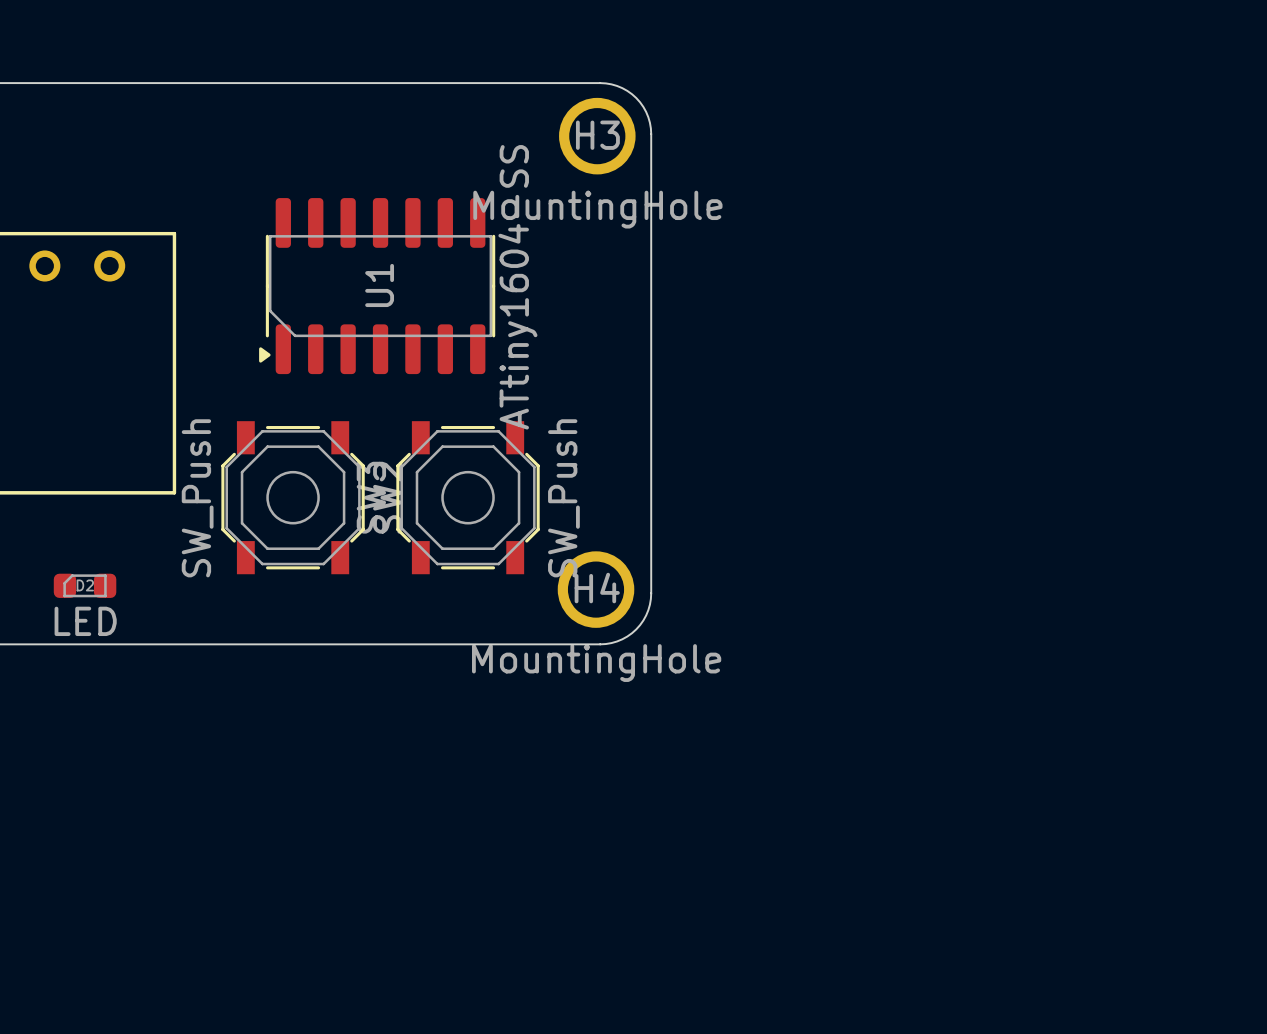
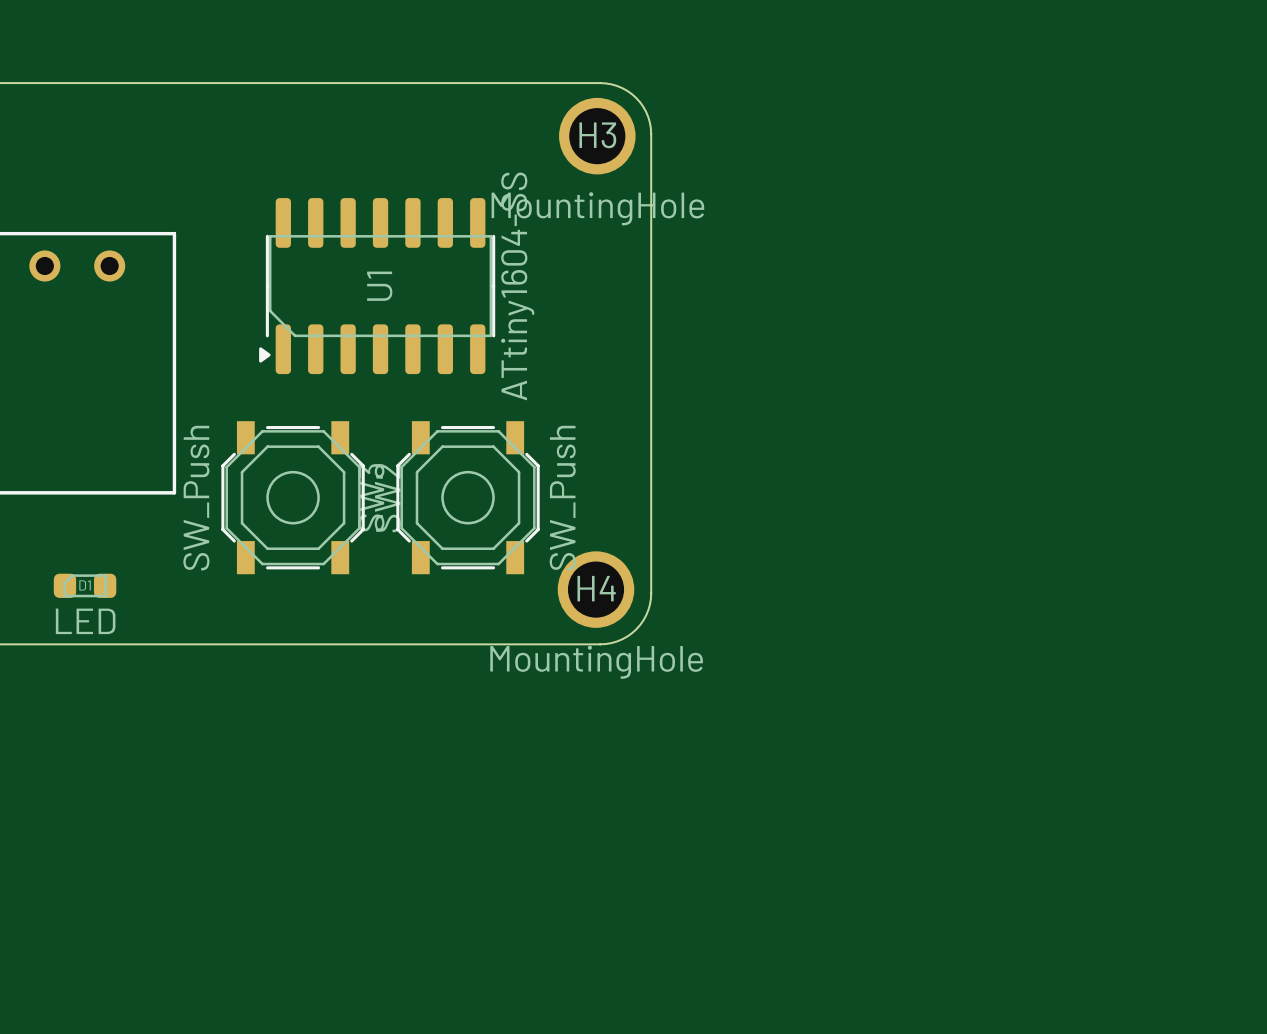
D2 name: D2 (85, 585) -> D1 (85, 585)

